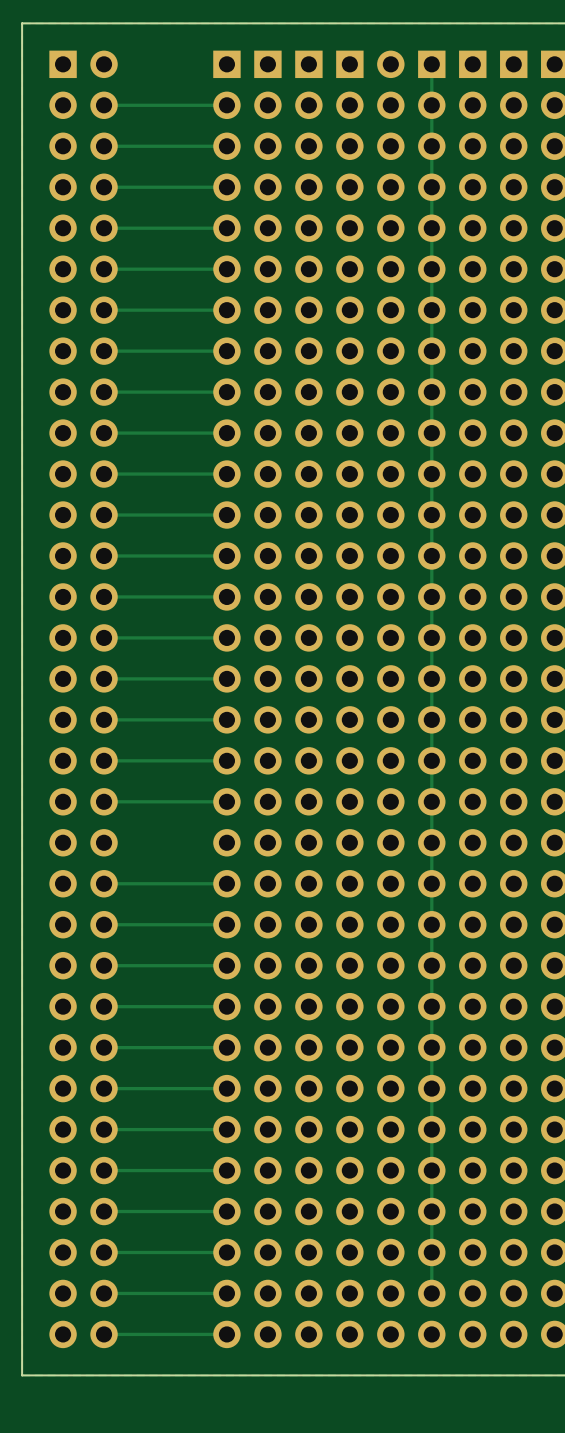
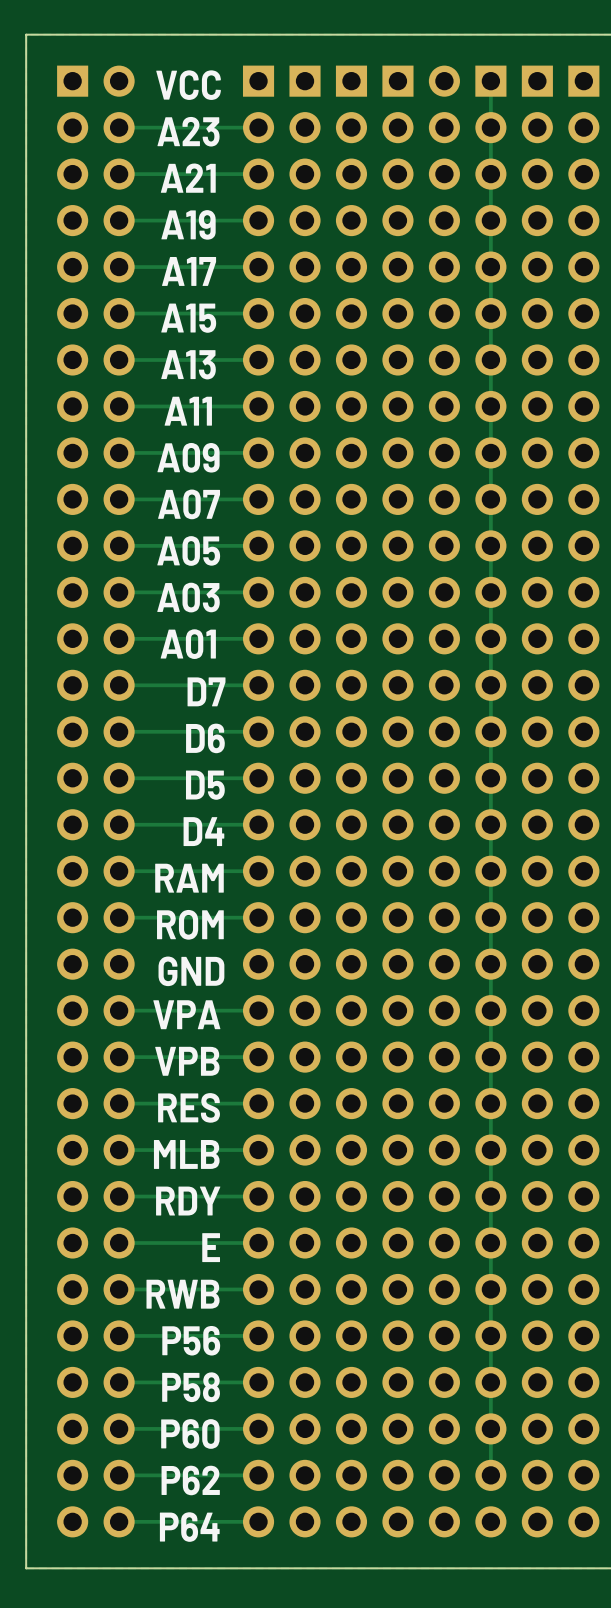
text: none -> VCC (188, 85)
text: none -> A23 (188, 131)
text: none -> A21 (188, 178)
text: none -> A19 (188, 224)
text: none -> A17 (189, 271)
text: none -> A15 (188, 318)
text: none -> A13 (188, 364)
text: none -> A11 (188, 411)
text: none -> A09 (188, 457)
text: none -> A07 (189, 504)
text: none -> A05 (188, 550)
text: none -> A03 (188, 597)
text: none -> A01 (188, 644)
text: none -> D7 (206, 691)
text: none -> D6 (205, 738)
text: none -> D5 (205, 785)
text: none -> D4 (203, 831)
text: none -> RAM (189, 878)
text: none -> ROM (190, 924)
text: none -> GND (191, 971)
text: none -> VPA (186, 1014)
text: none -> VPB (187, 1061)
text: none -> RES (189, 1107)
text: none -> MLB (186, 1154)
text: none -> RDY (188, 1201)
text: none -> E (211, 1247)
text: none -> RWB (183, 1294)
text: none -> P56 (191, 1340)
text: none -> P58 (191, 1387)
text: none -> P60 (190, 1433)
text: none -> P62 (190, 1480)
text: none -> P64 (189, 1527)

